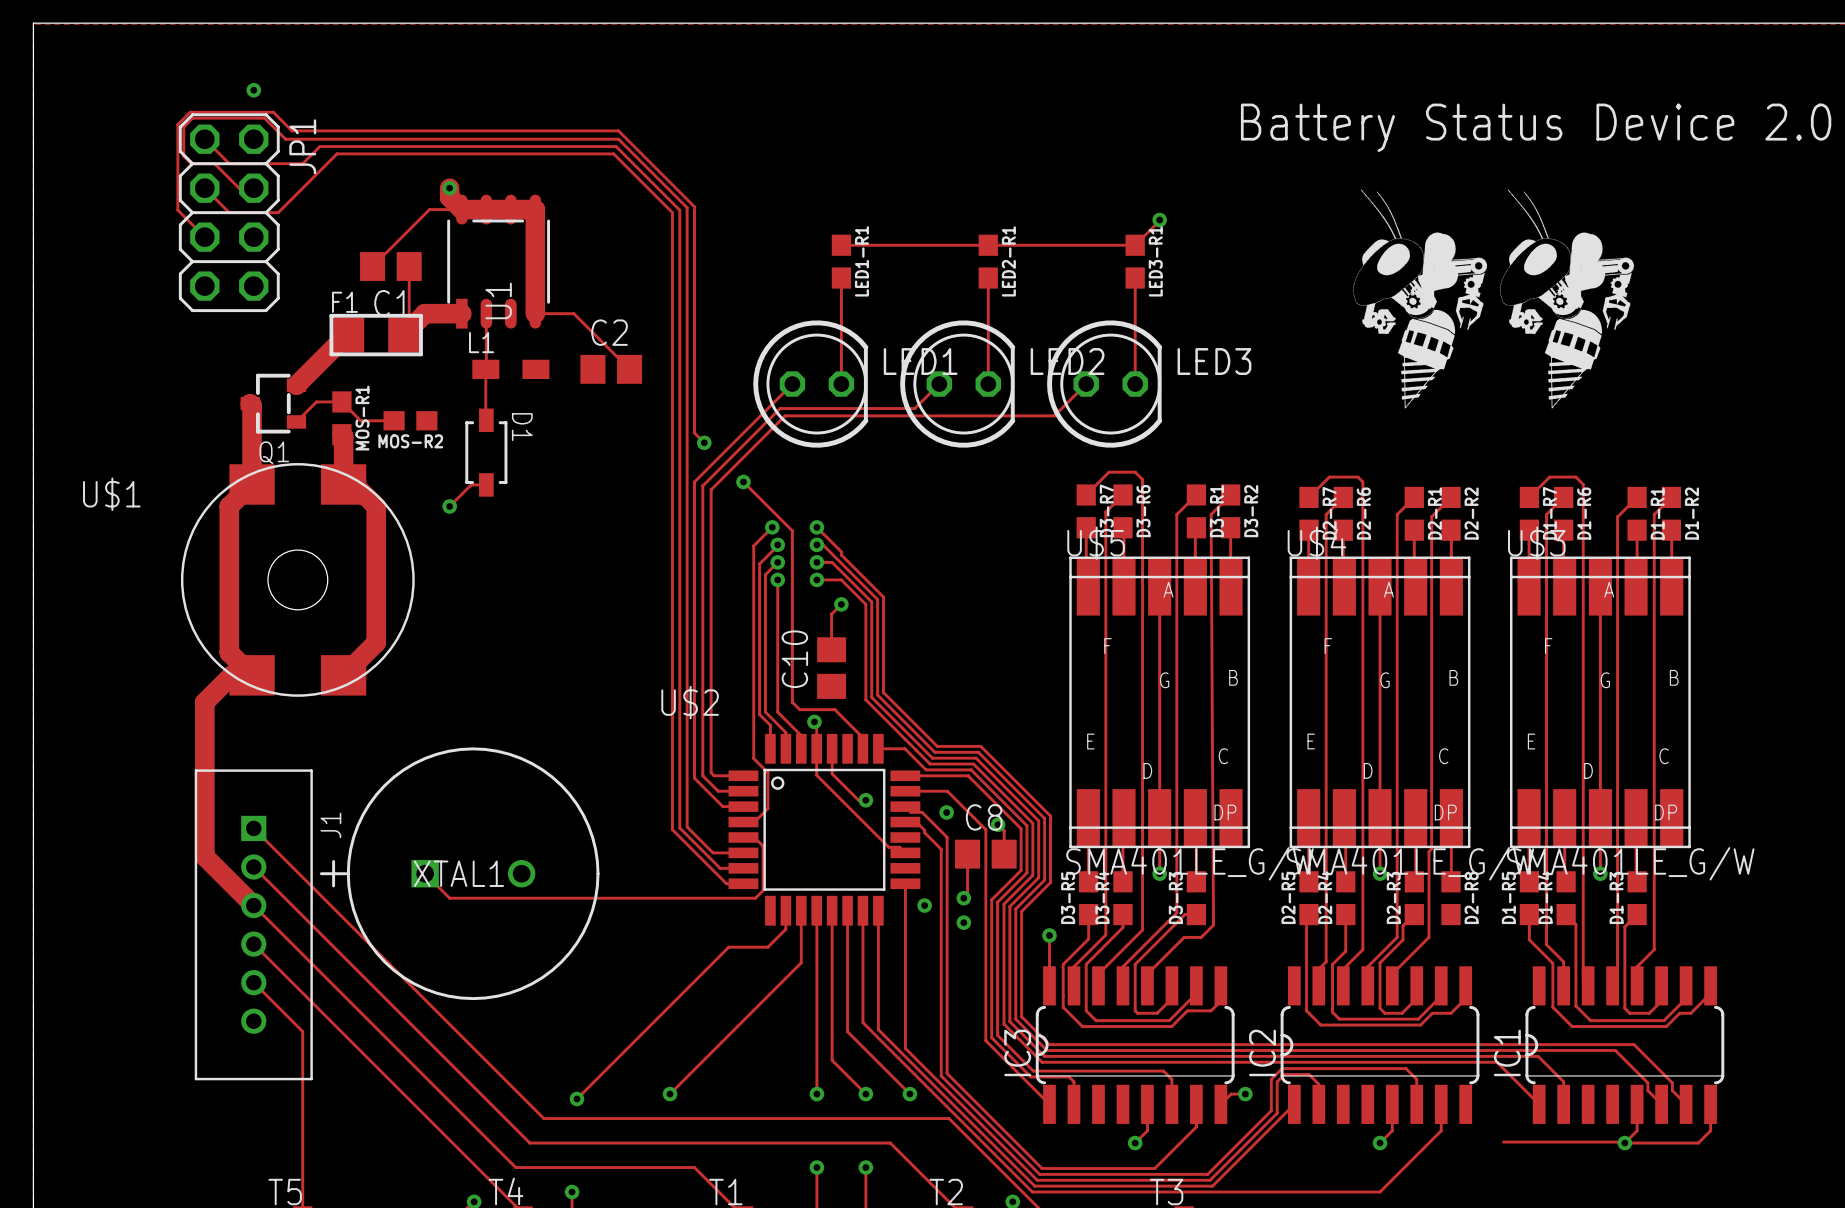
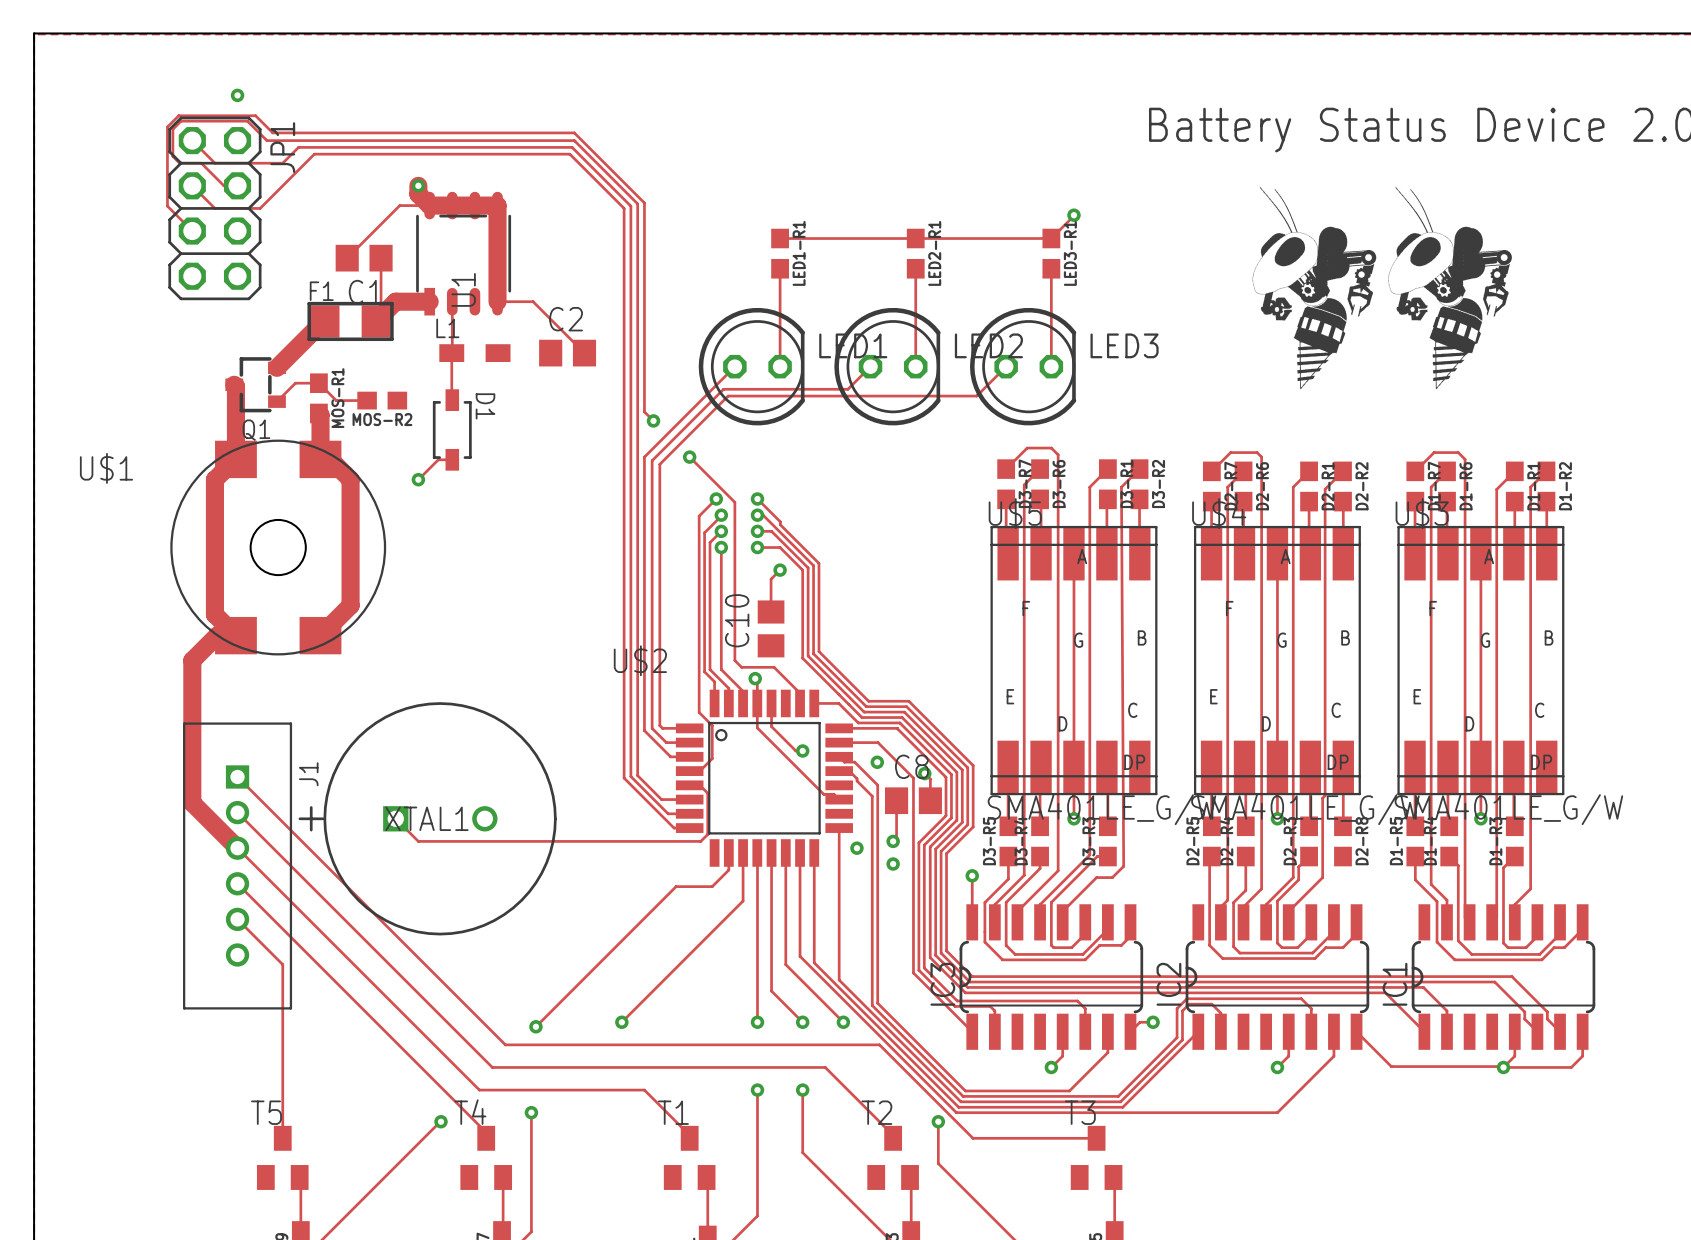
track: none -> (1356, 1031) (1391, 1066)

